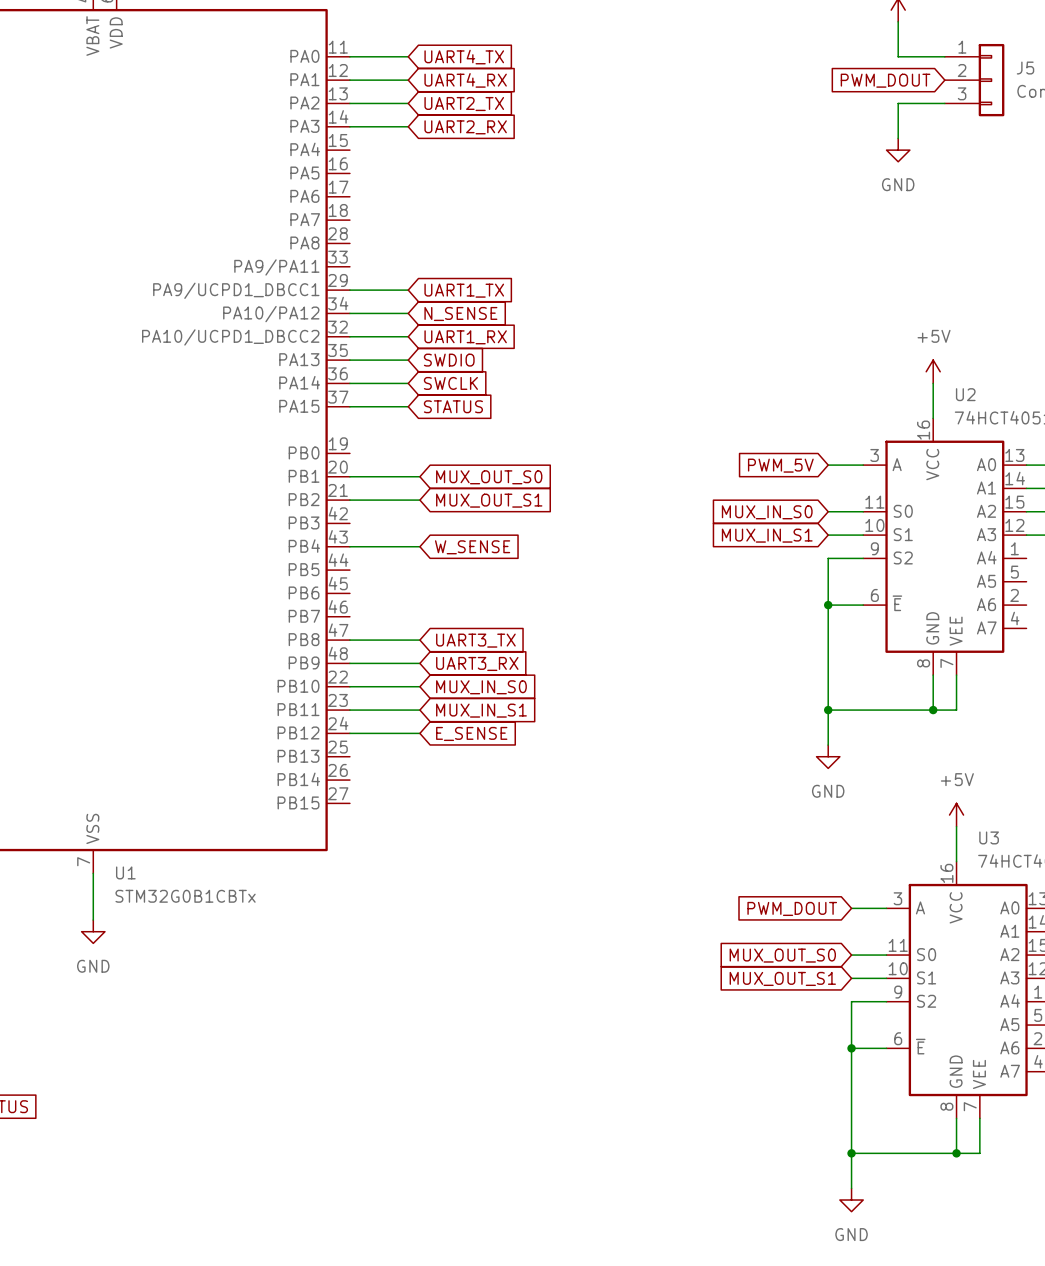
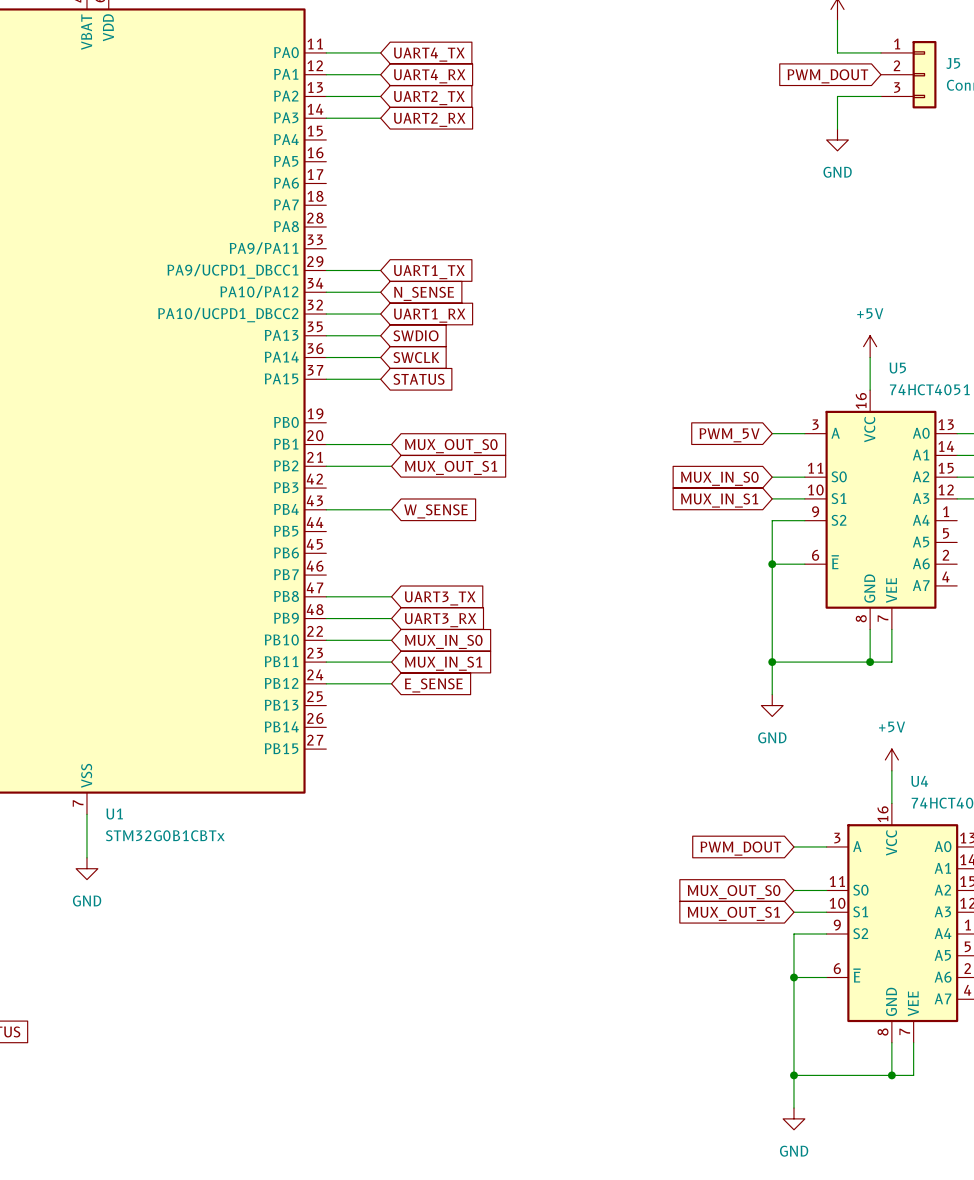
U2 name: U2 (965, 394) -> U5 (897, 368)
U3 name: U3 (989, 837) -> U4 (919, 781)

